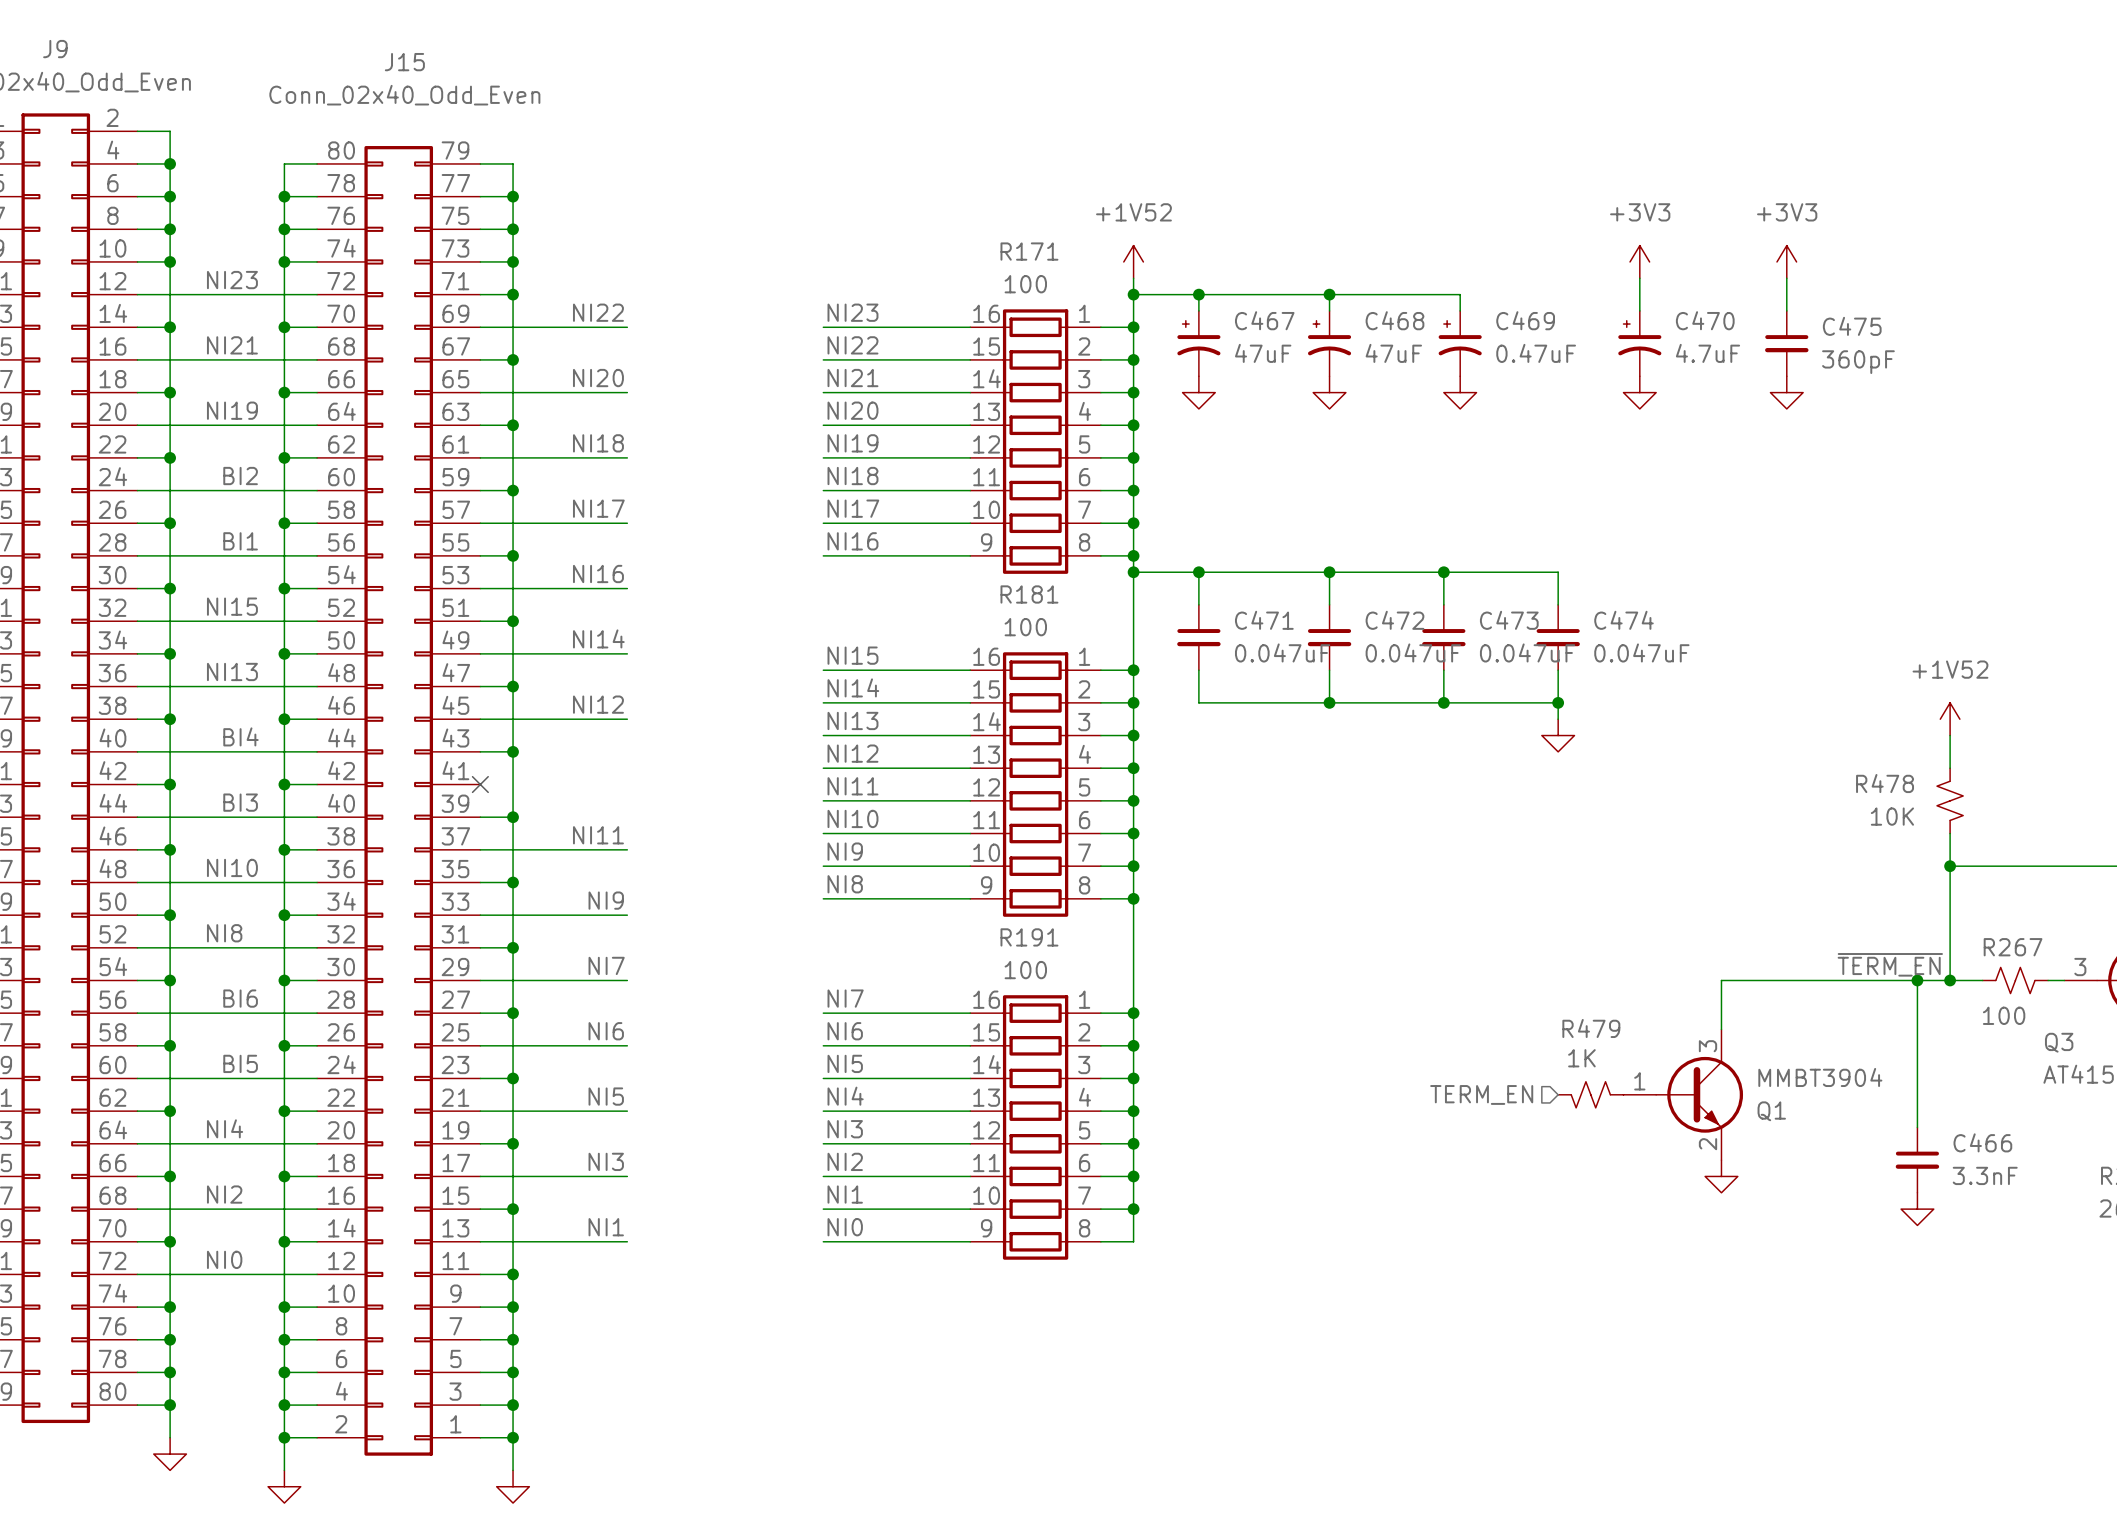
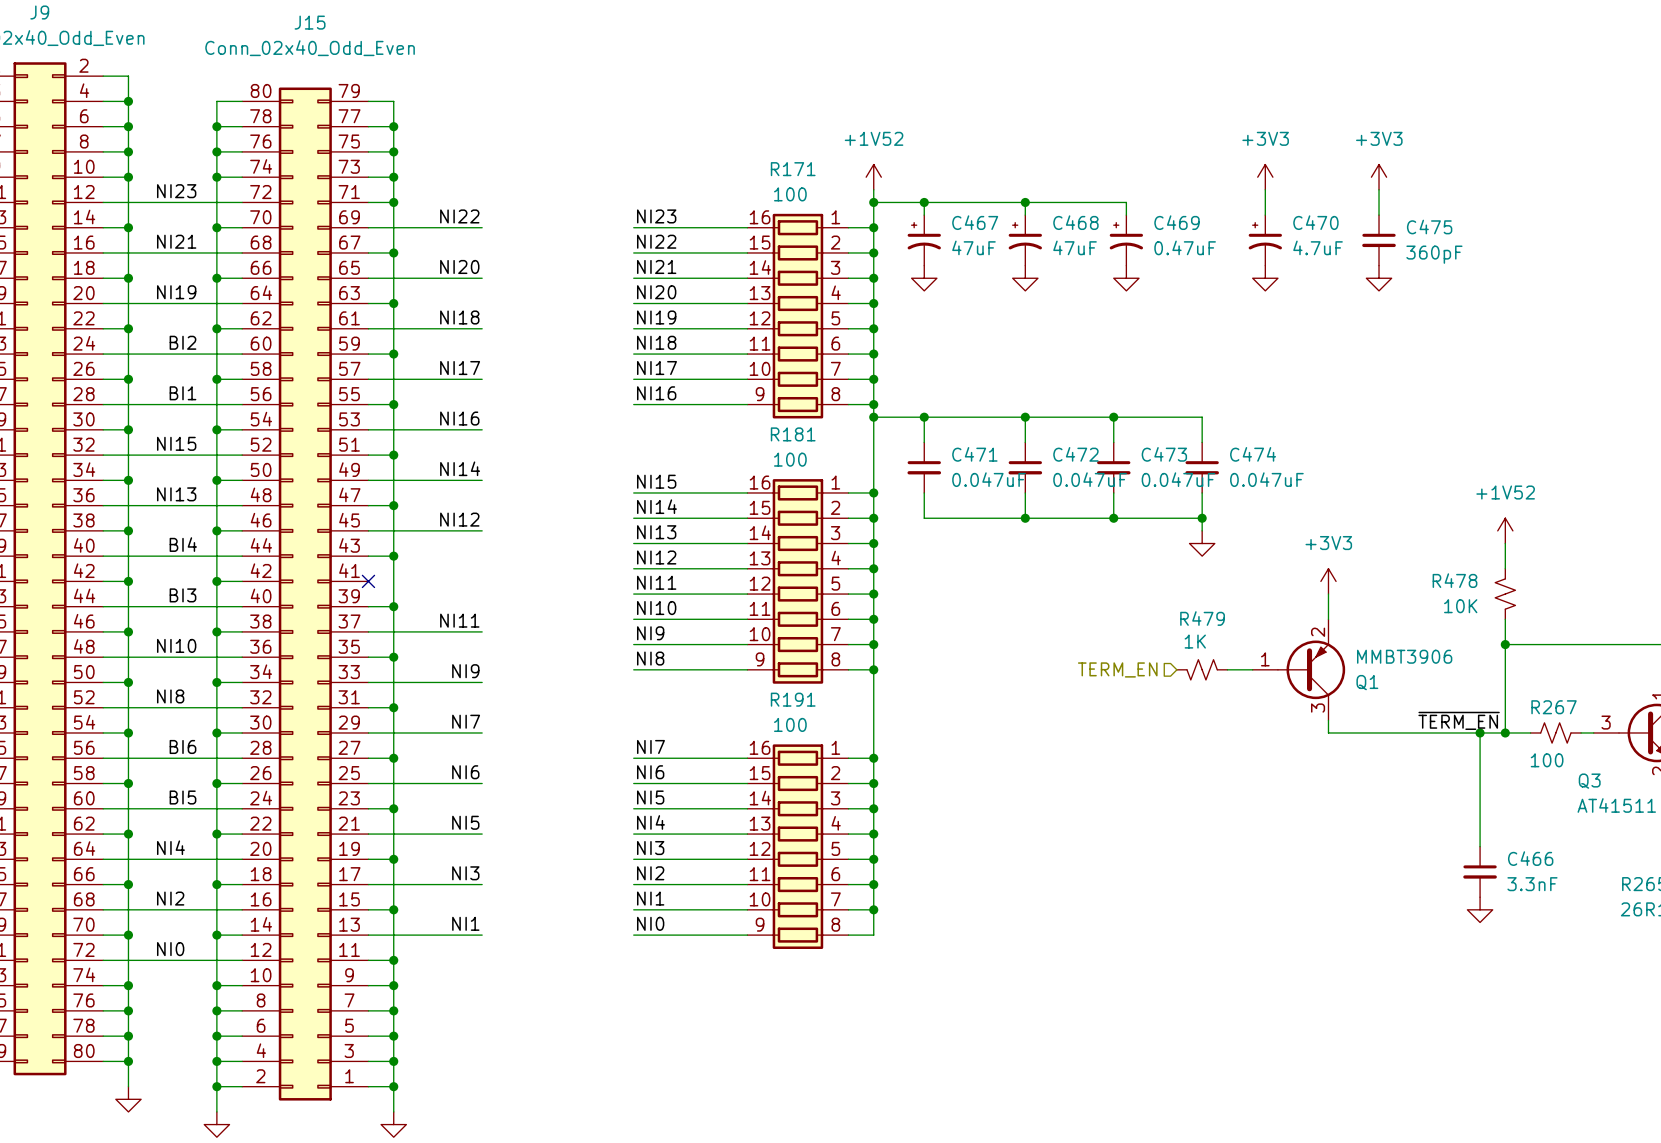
power symbol: none -> +3V3 (1328, 581)
wire: none -> (1328, 594) (1328, 619)
wire: none -> (1227, 669) (1252, 669)
wire: (1721, 980) (1721, 1029) -> (1328, 732) (1328, 720)
Q1 symbol: [1623, 1029, 1744, 1161] -> [1252, 619, 1346, 721]
Q1 value: MMBT3904 (1820, 1077) -> MMBT3906 (1404, 656)
hierarchical label position: TERM_EN (1481, 1094) -> TERM_EN (1117, 669)
R479 position: (1590, 1094) -> (1202, 669)
power symbol: (1721, 1176) -> none

